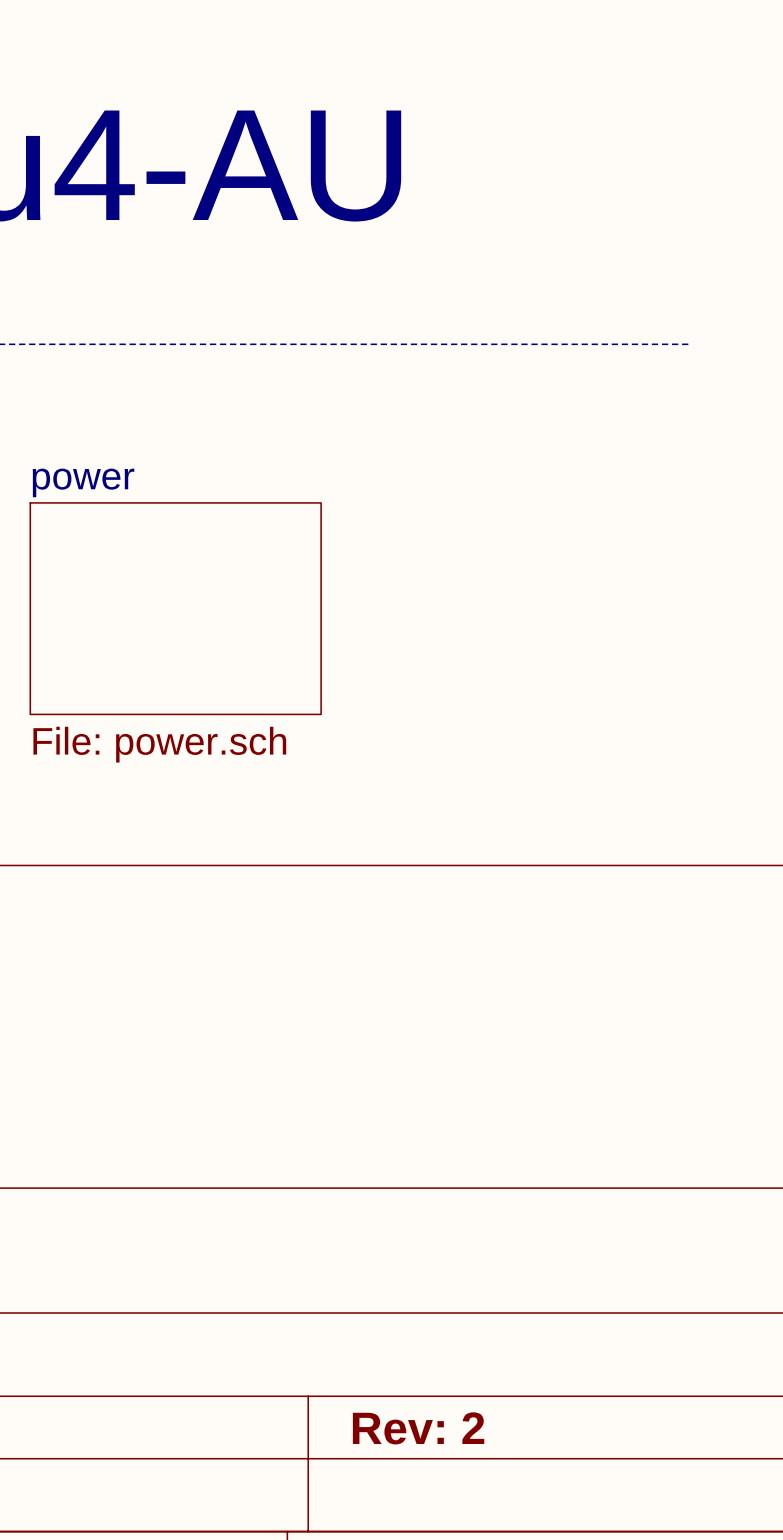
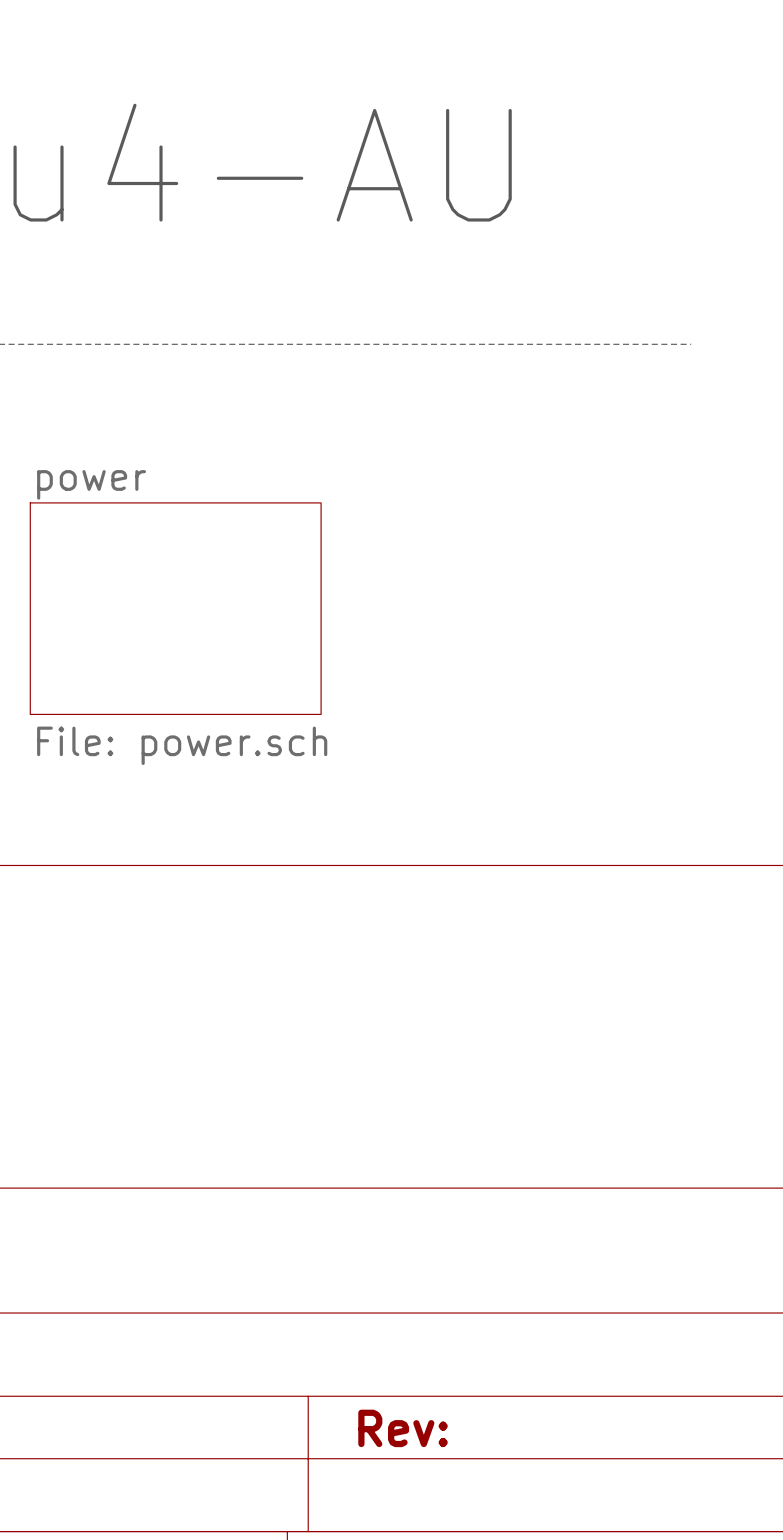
title block: Rev: 2 (418, 1428) -> Rev: (403, 1428)

